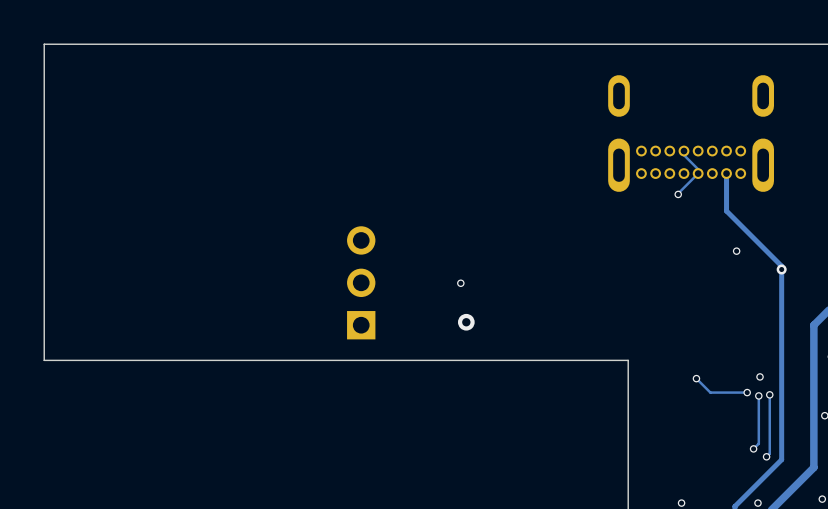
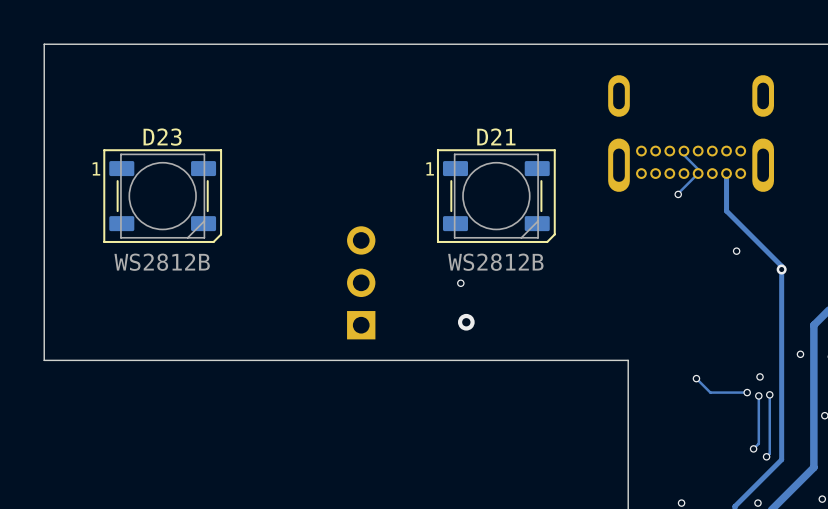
D23: none -> WS2812B (162, 196)
D21: none -> WS2812B (496, 196)
via: none -> (800, 354)

